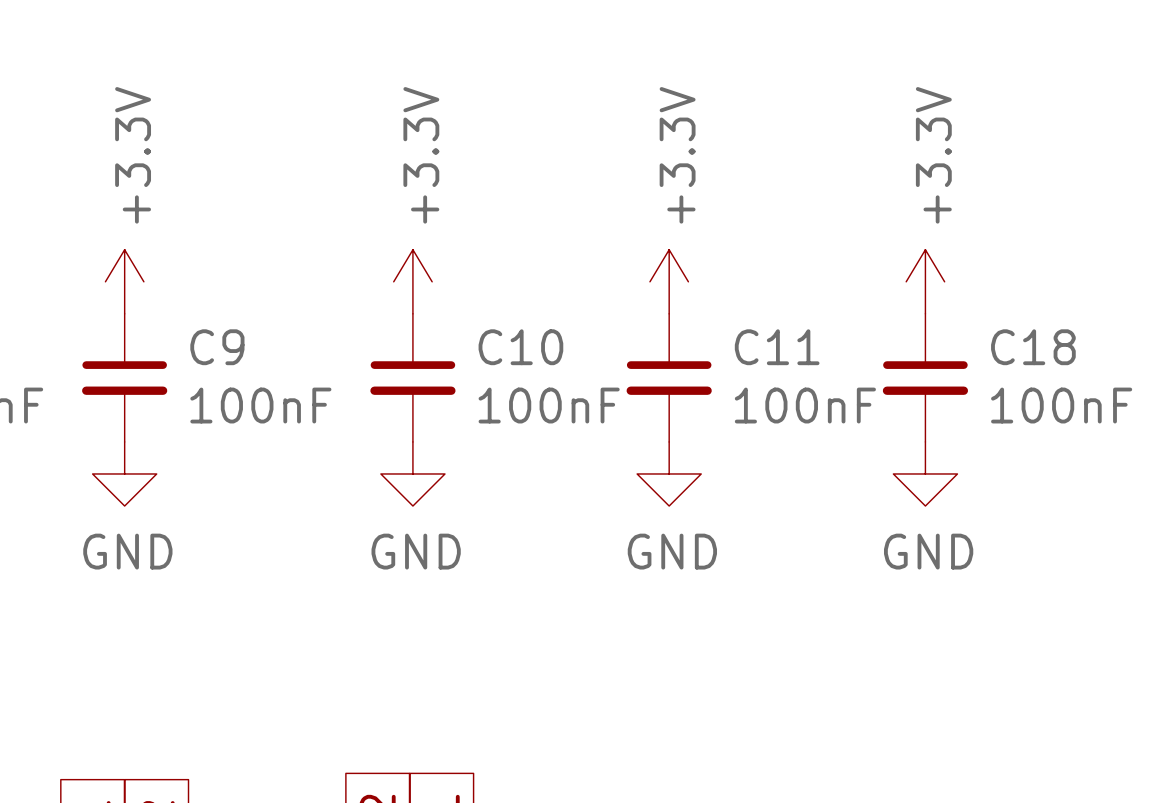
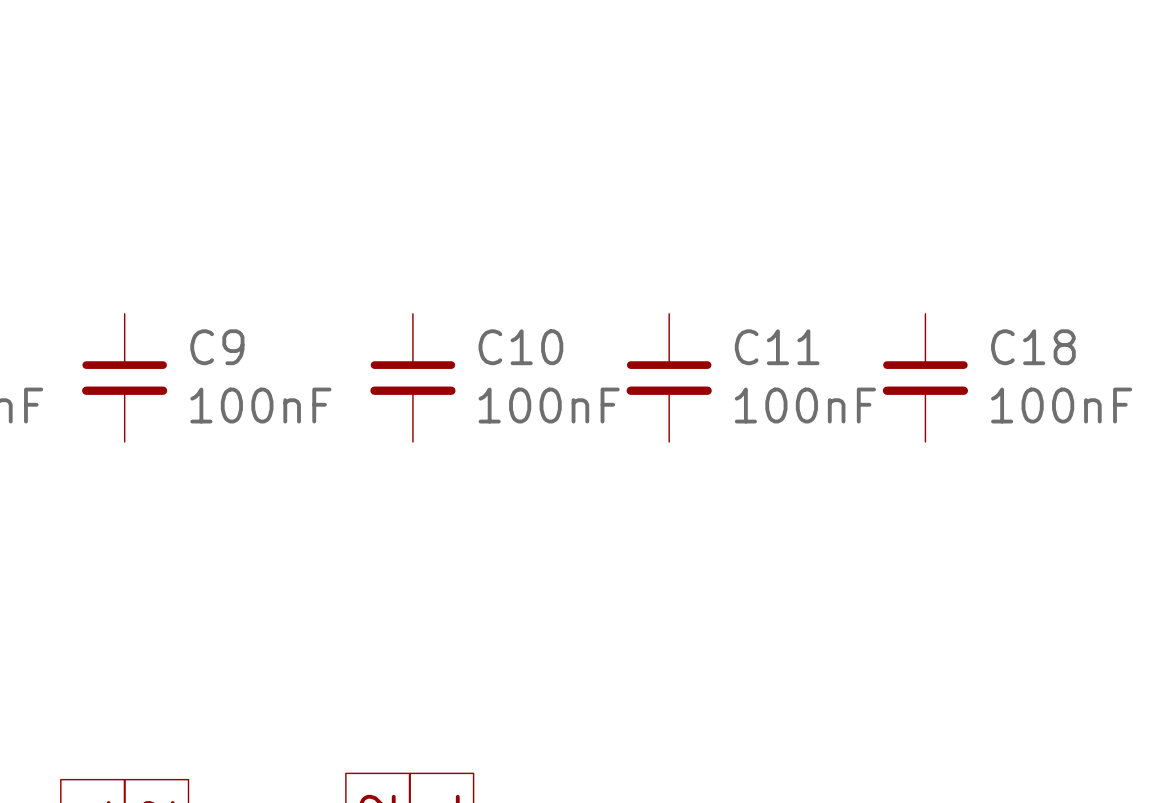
power symbol: +3.3V (124, 281) -> none
power symbol: +3.3V (412, 281) -> none
power symbol: +3.3V (669, 281) -> none
power symbol: +3.3V (925, 281) -> none
power symbol: GND (124, 473) -> none
power symbol: GND (412, 473) -> none
power symbol: GND (669, 473) -> none
power symbol: GND (925, 473) -> none

